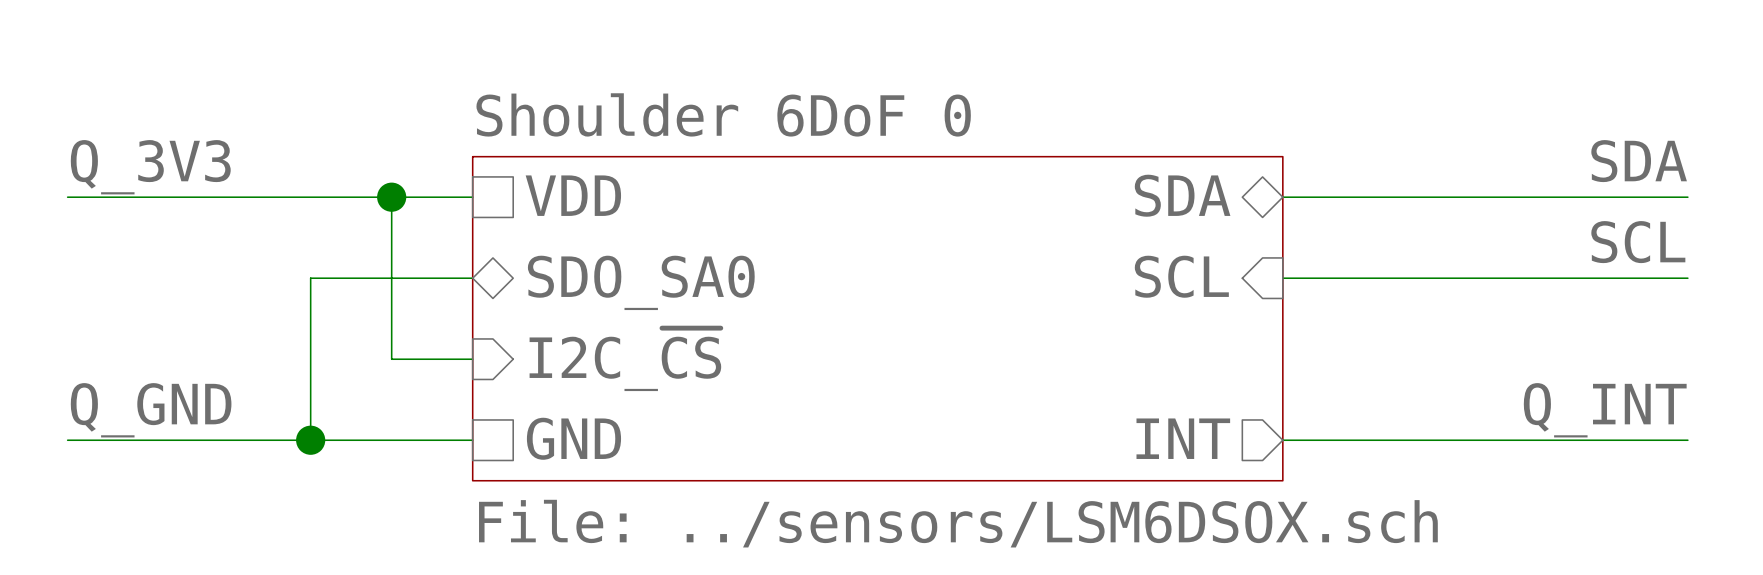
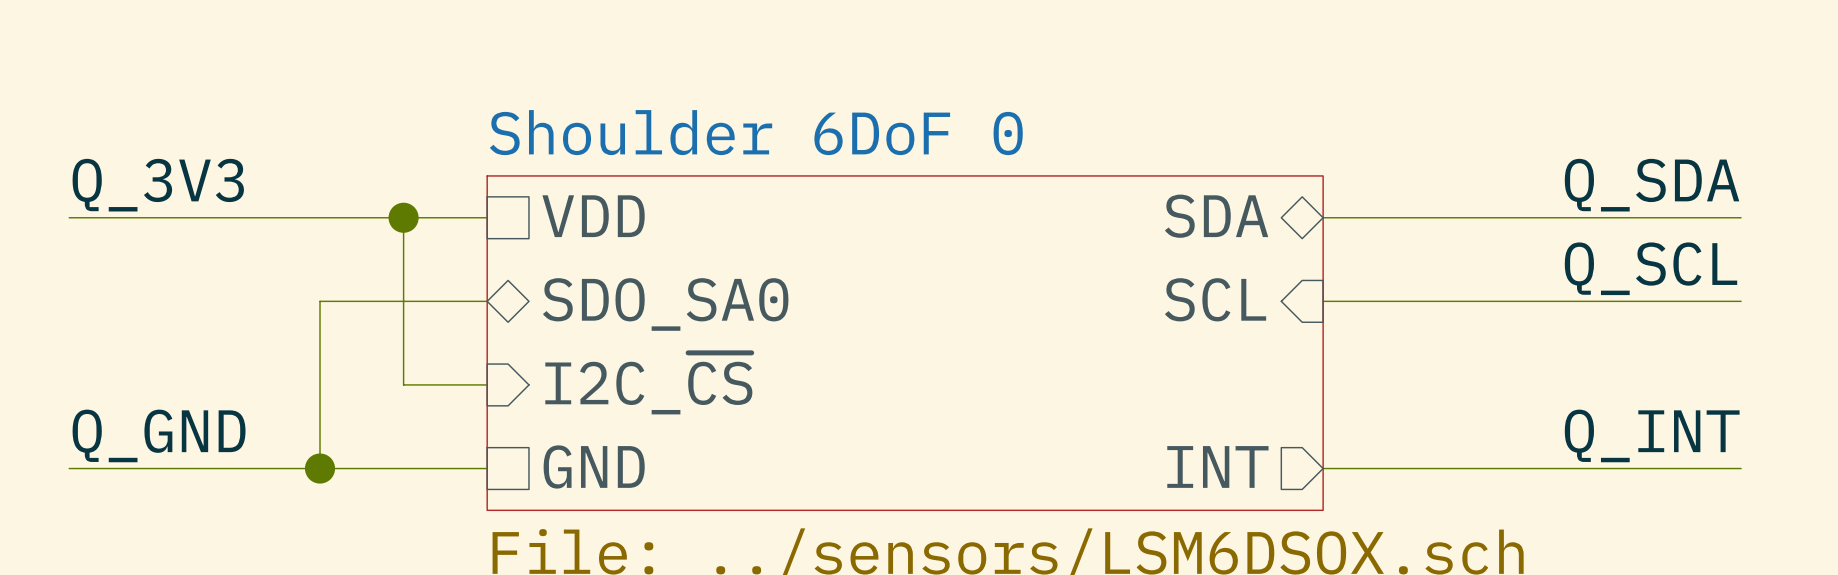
label: SDA (1639, 161) -> Q_SDA (1652, 185)
label: SCL (1638, 242) -> Q_SCL (1650, 268)

